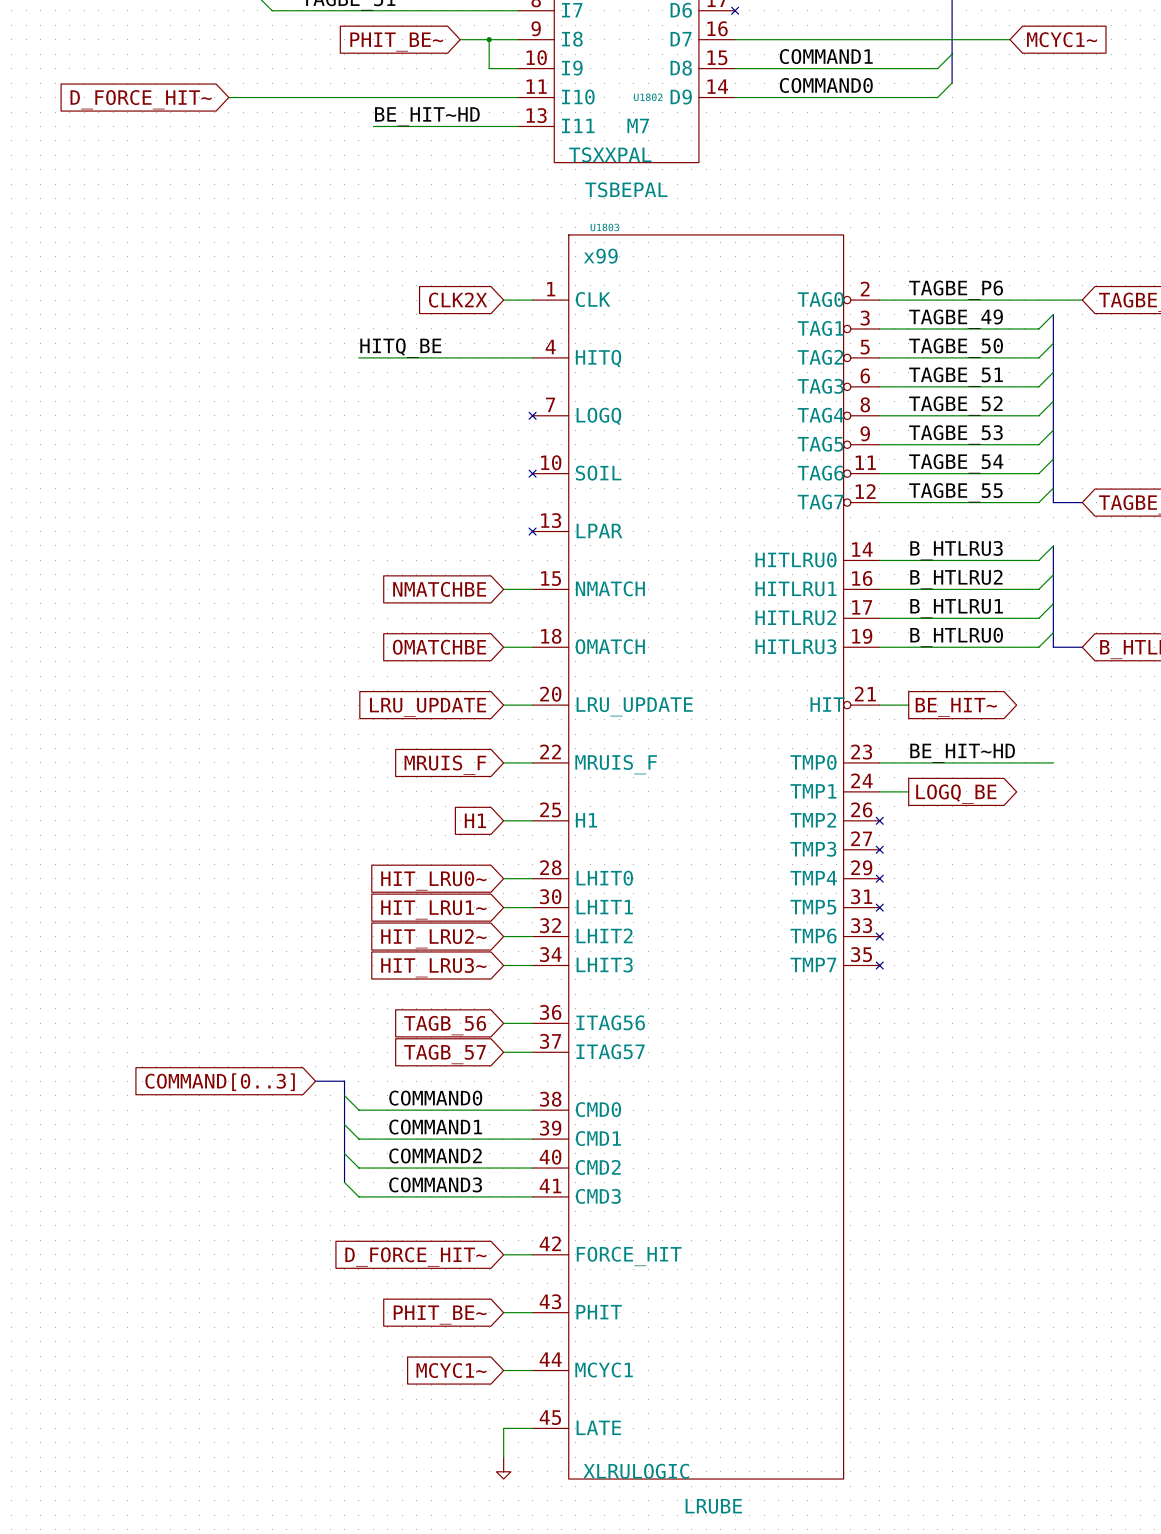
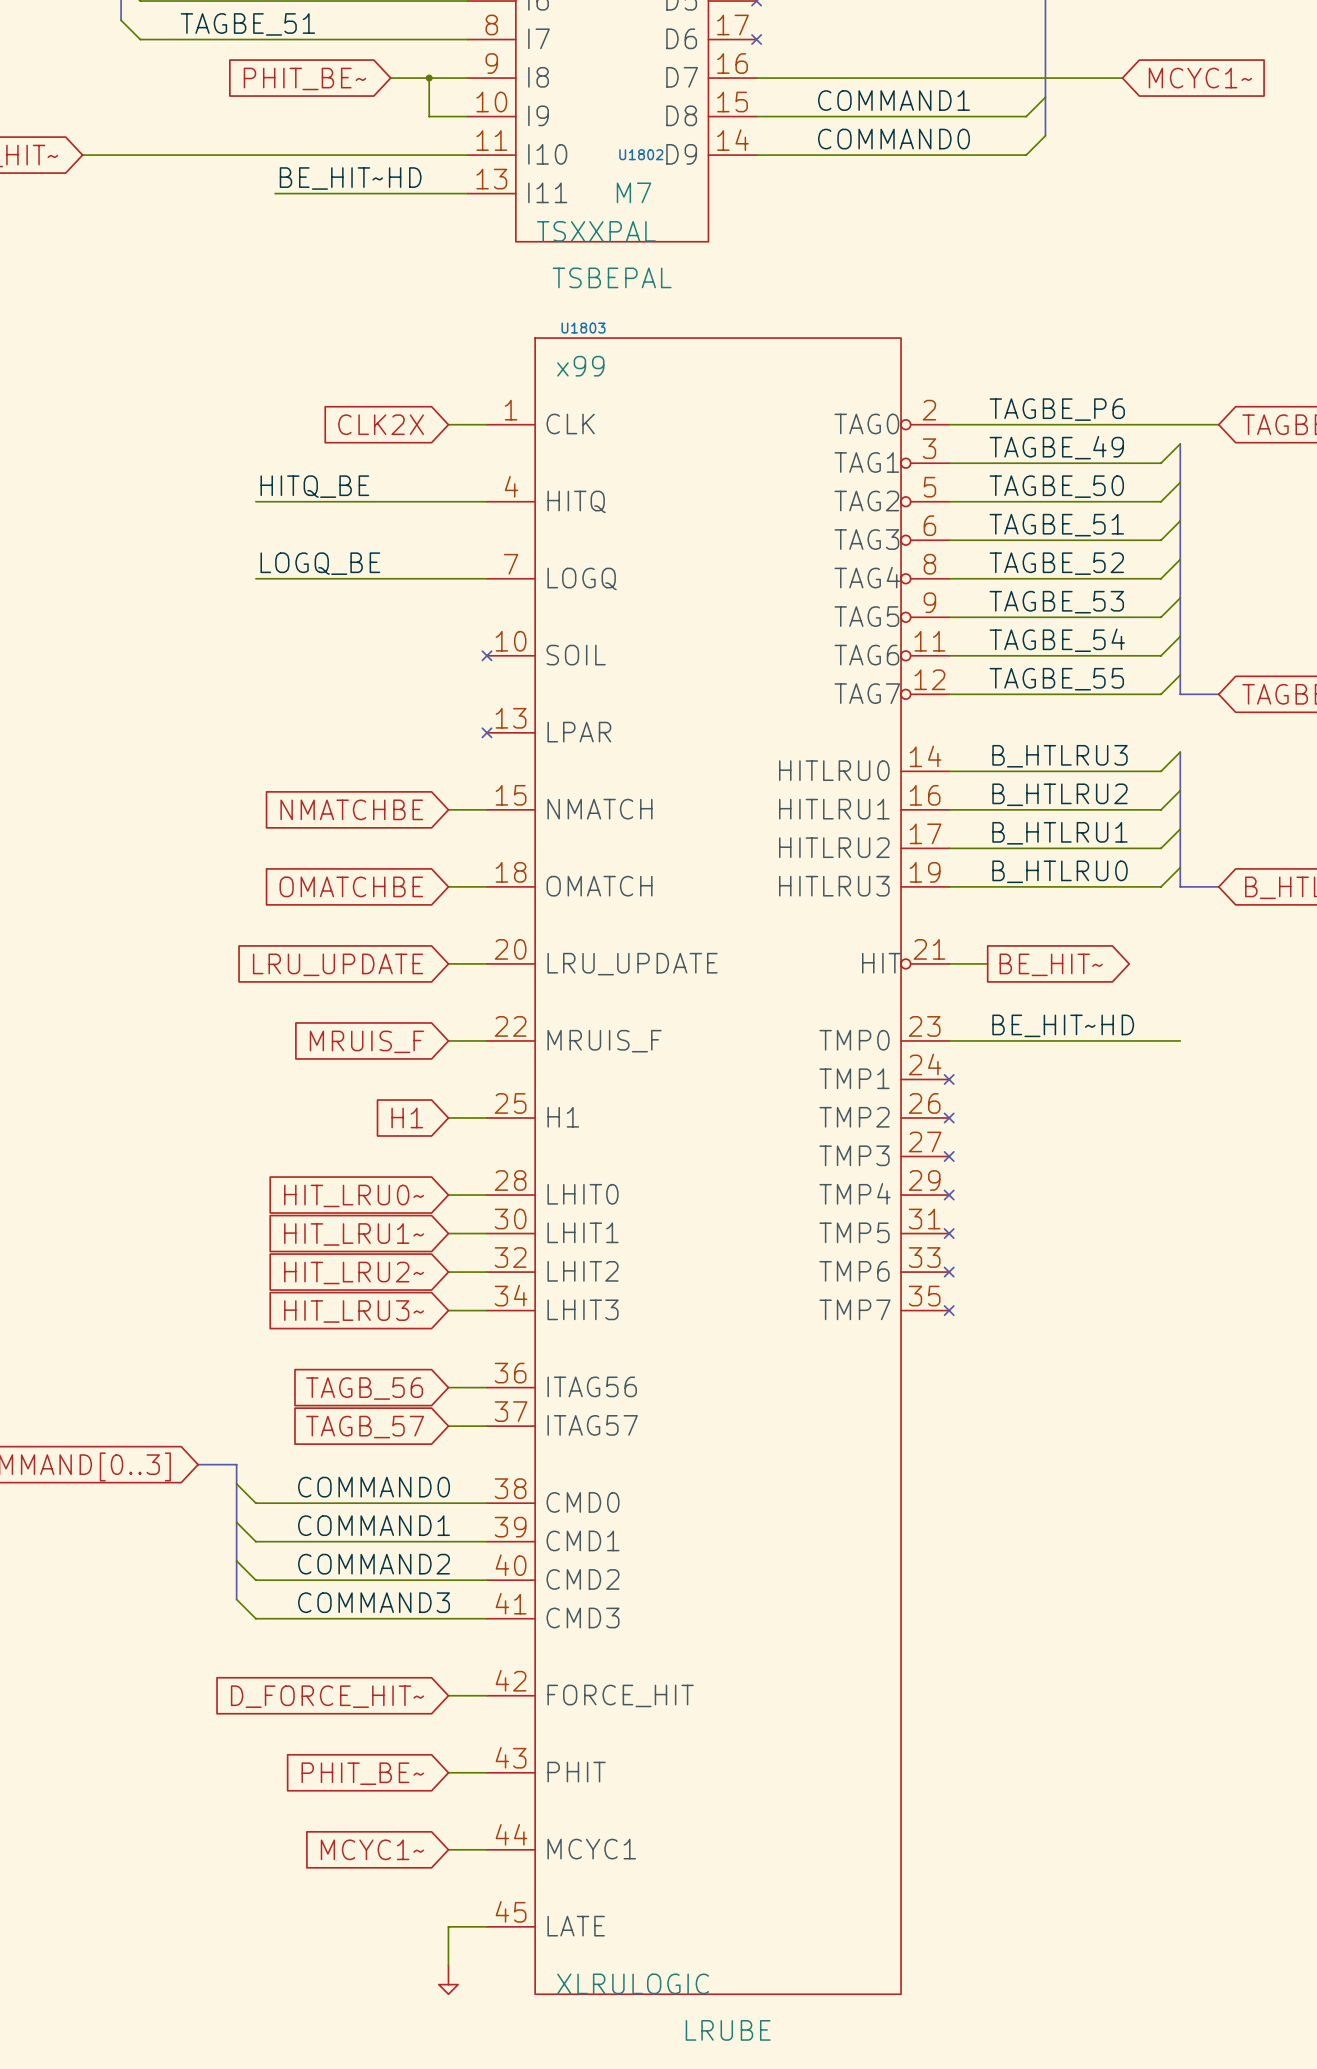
label: none -> LOGQ_BE (320, 563)
wire: none -> (255, 578) (486, 578)
no-connect mark: (532, 415) -> none
wire: (879, 791) (908, 791) -> none
no-connect mark: none -> (949, 1079)
global label: LOGQ_BE (956, 794) -> none

